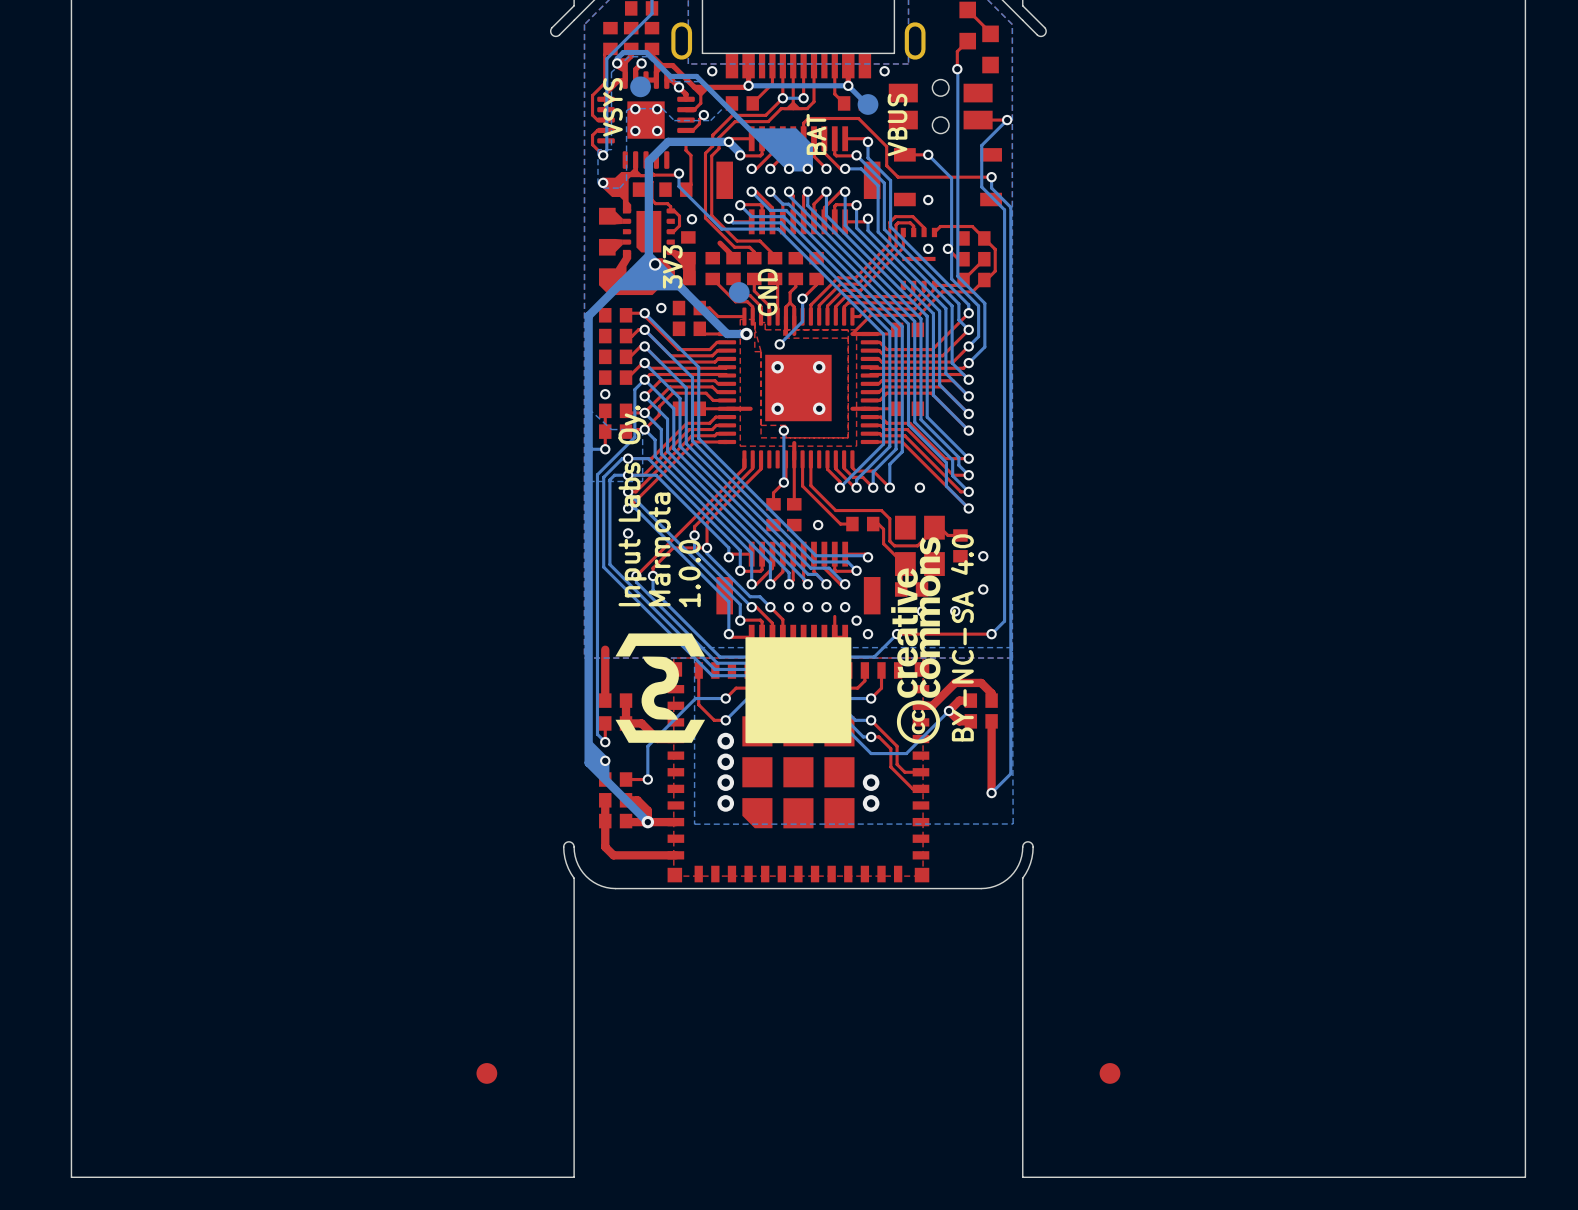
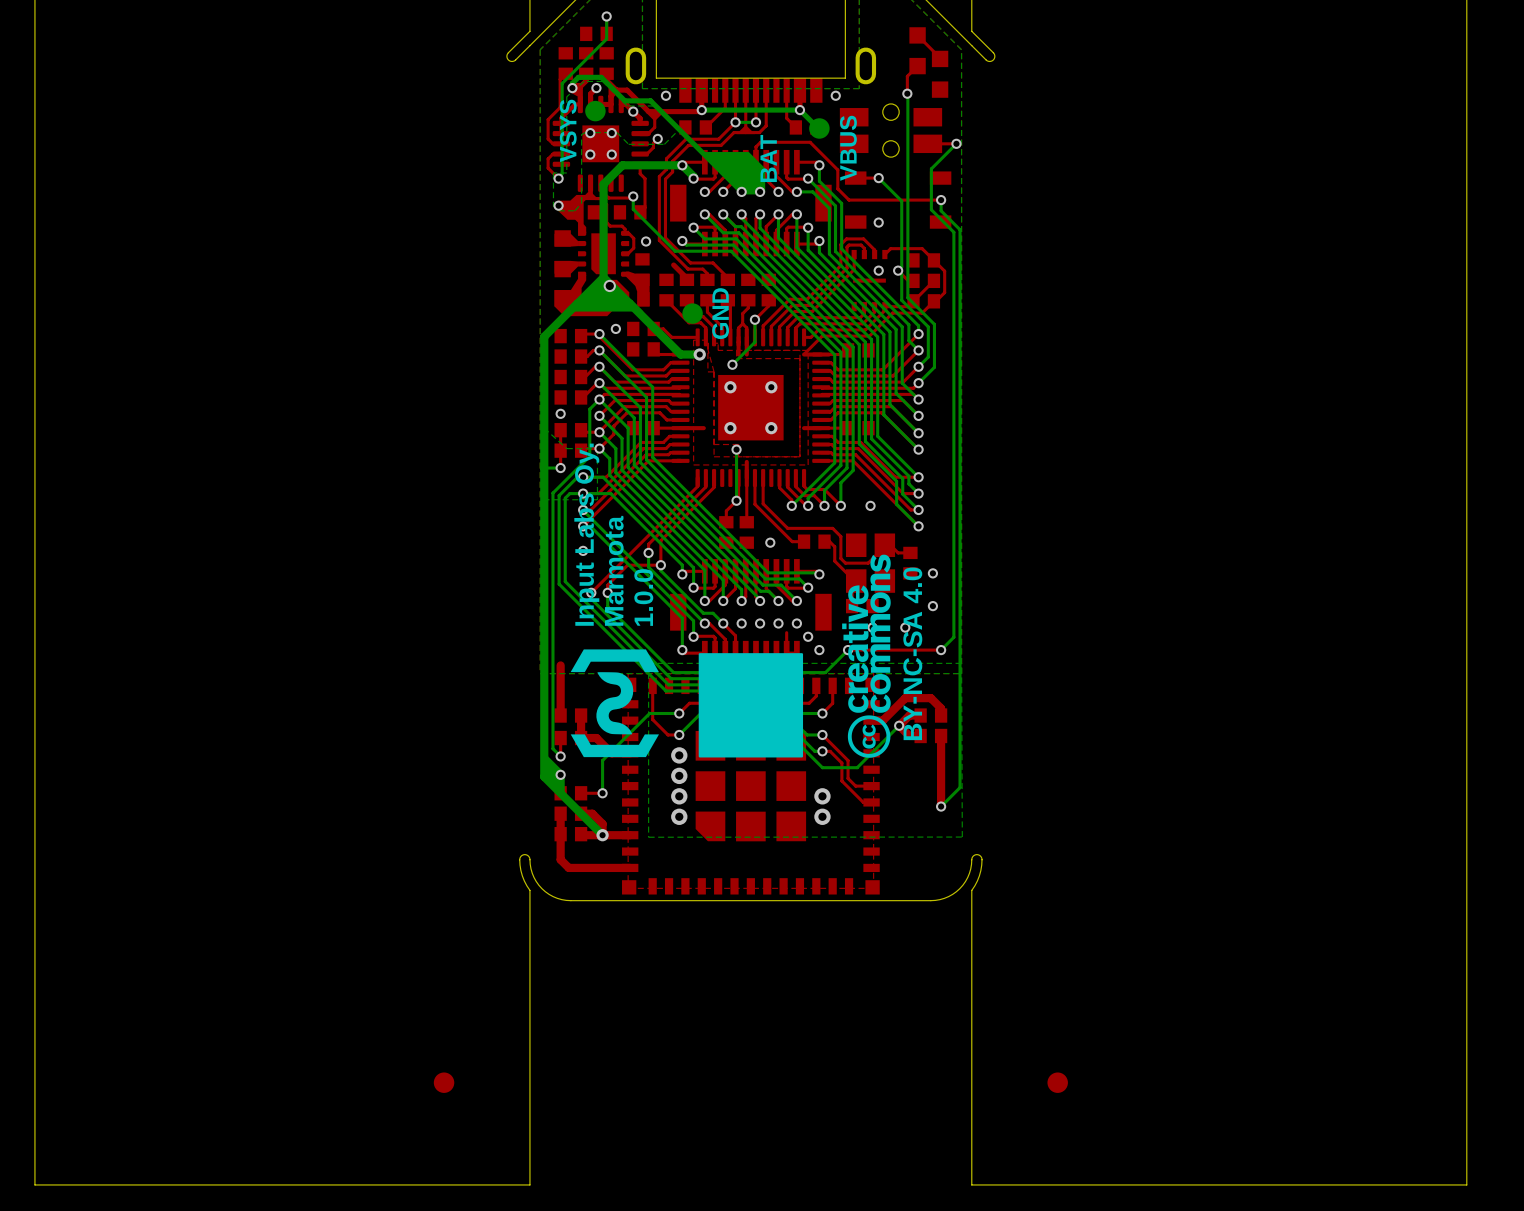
text: 3V3 (672, 266) -> none

